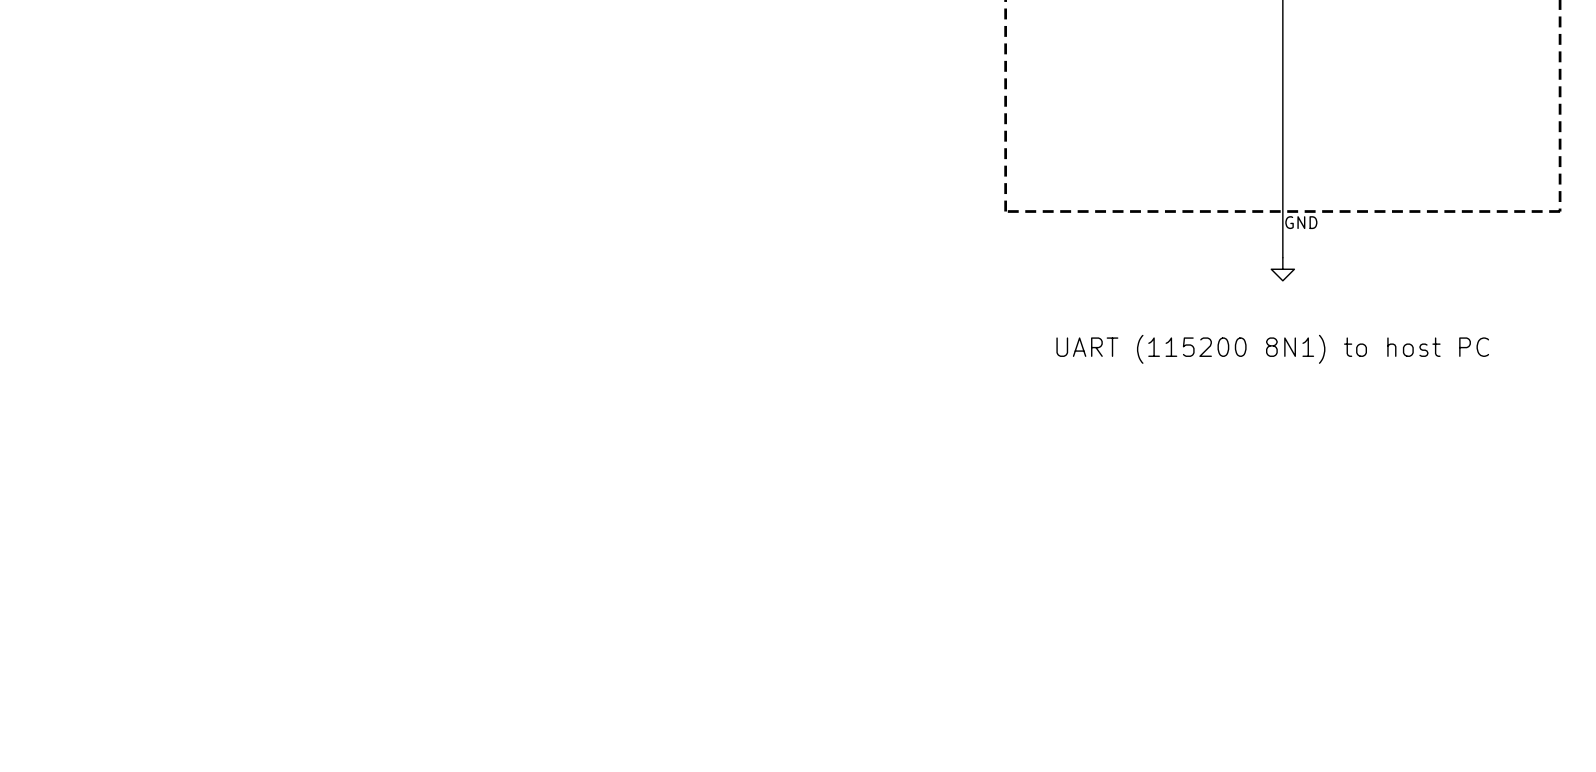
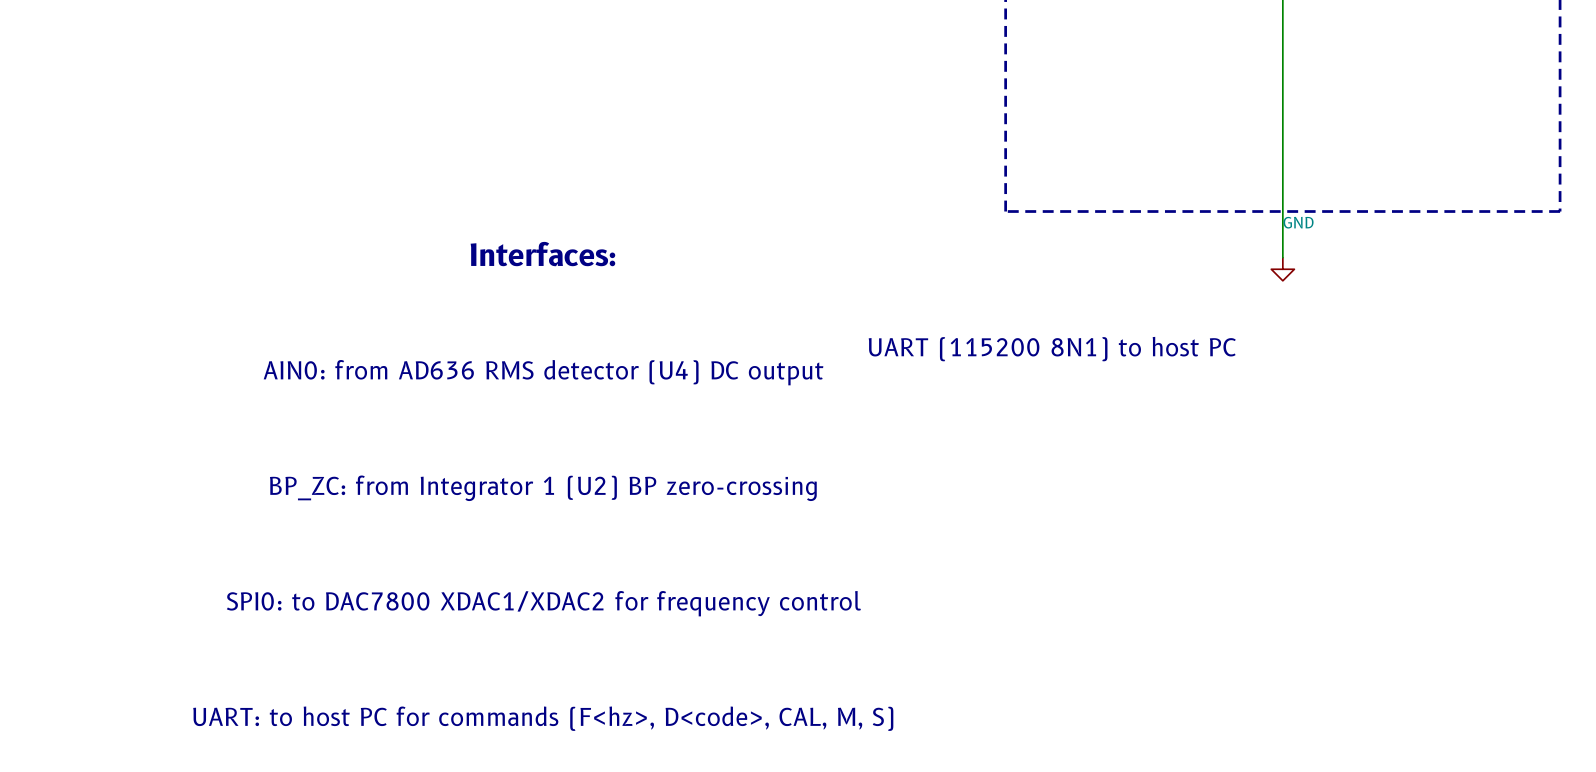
text: none -> Interfaces: (542, 254)
text position: UART (115200 8N1) to host PC (1272, 349) -> UART (115200 8N1) to host PC (1052, 349)
text: none -> AIN0: from AD636 RMS detector (U4) DC output (543, 372)
text: none -> BP_ZC: from Integrator 1 (U2) BP zero-crossing (543, 488)
text: none -> SPI0: to DAC7800 XDAC1/XDAC2 for frequency control (543, 603)
text: none -> UART: to host PC for commands (F<hz>, D<code>, CAL, M, S) (543, 718)

